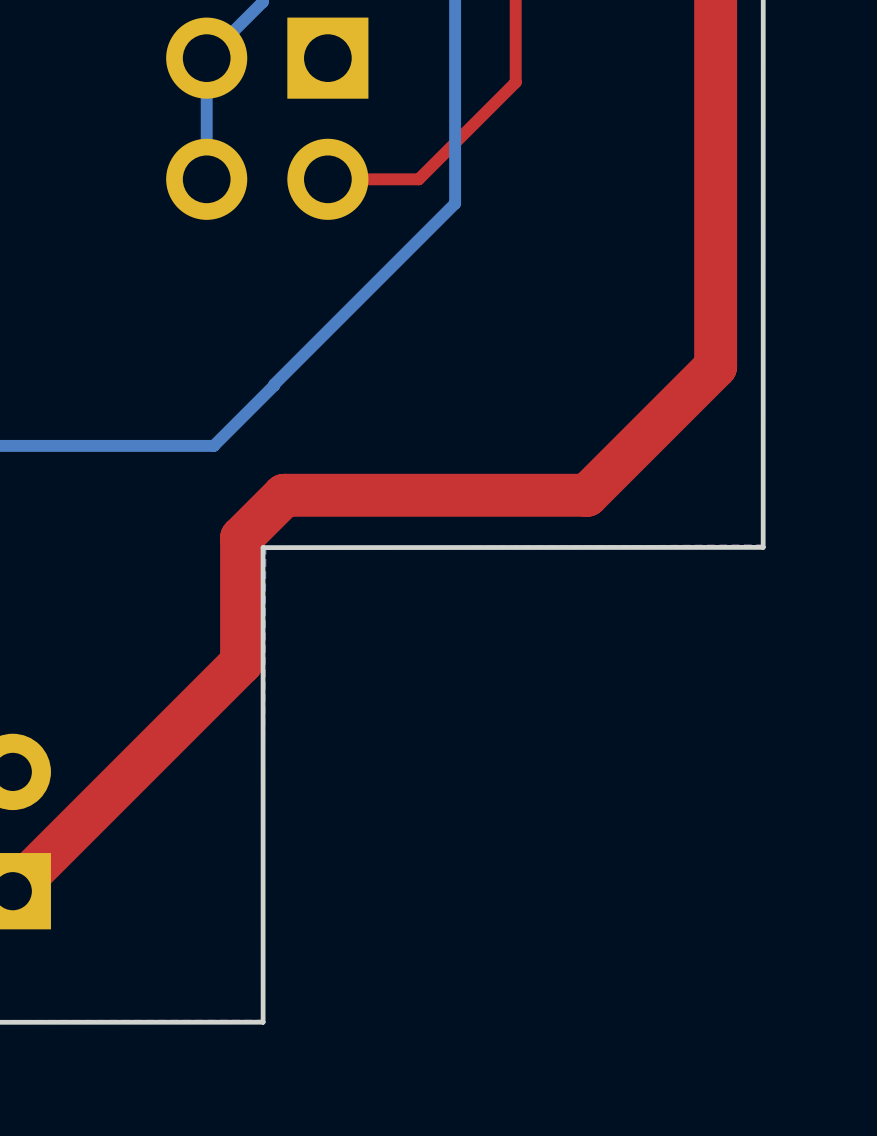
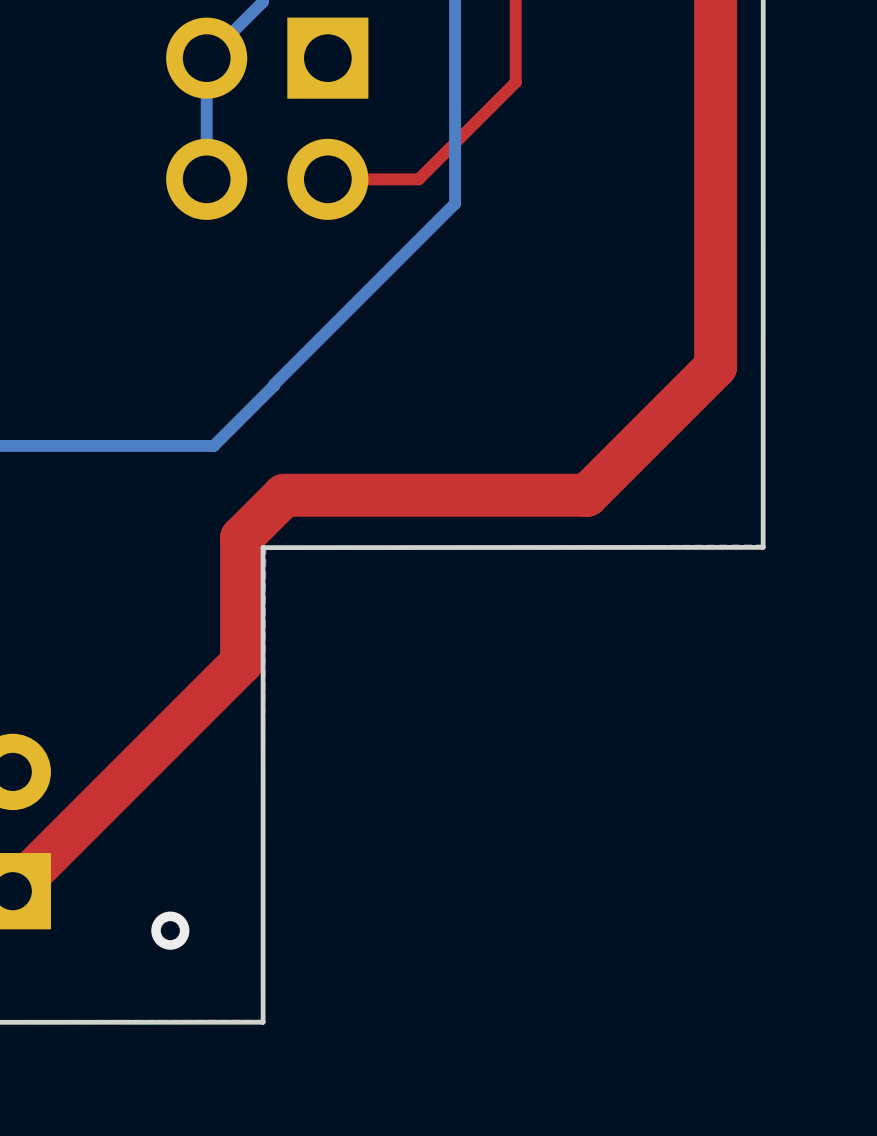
via: none -> (170, 930)

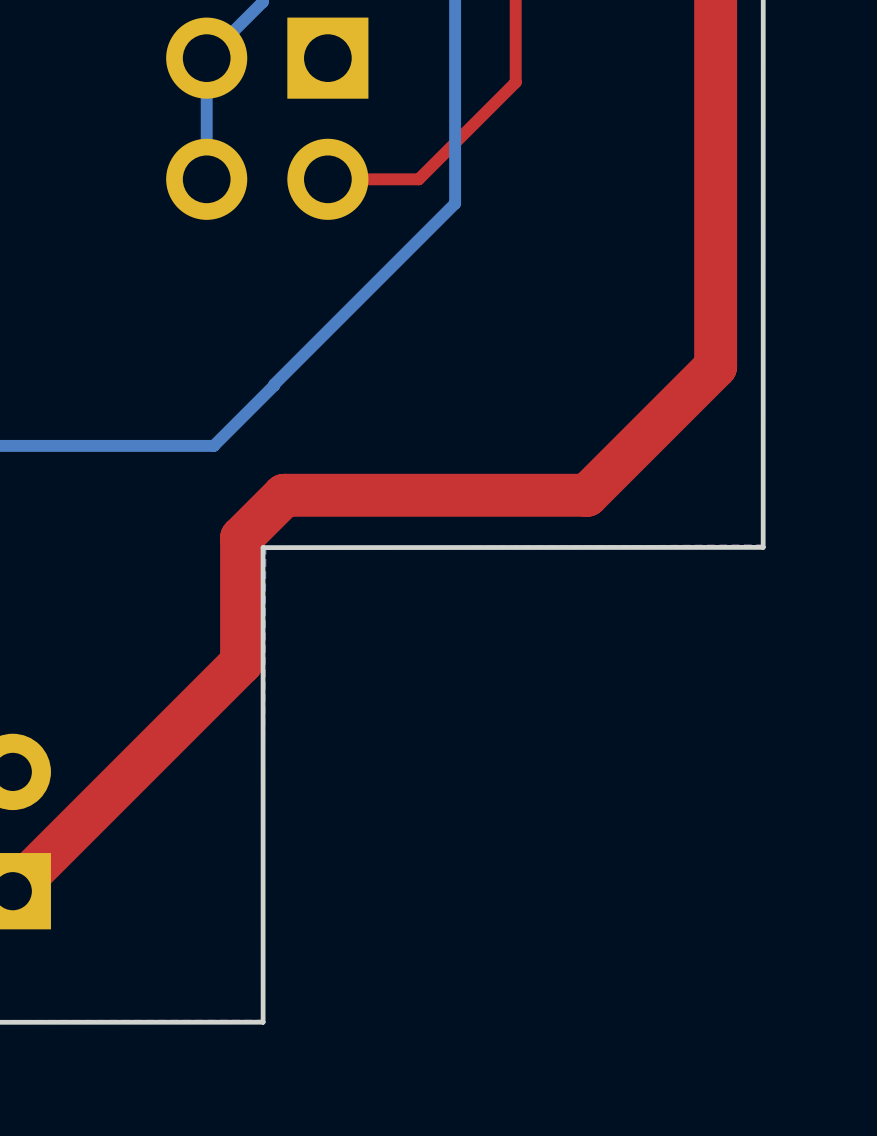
via: (170, 930) -> none

